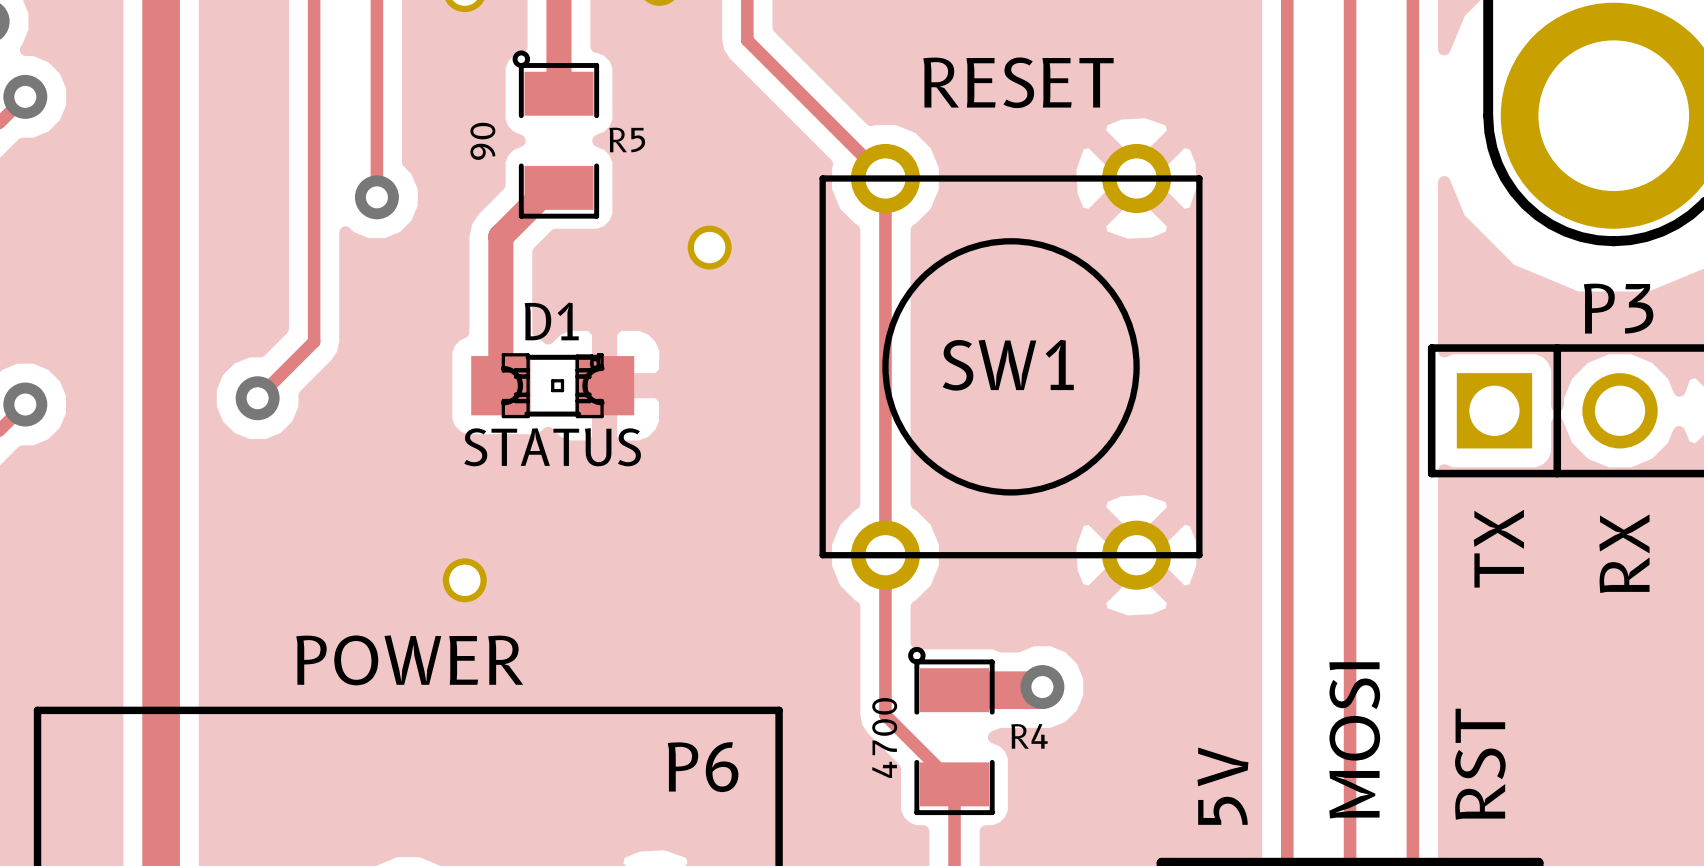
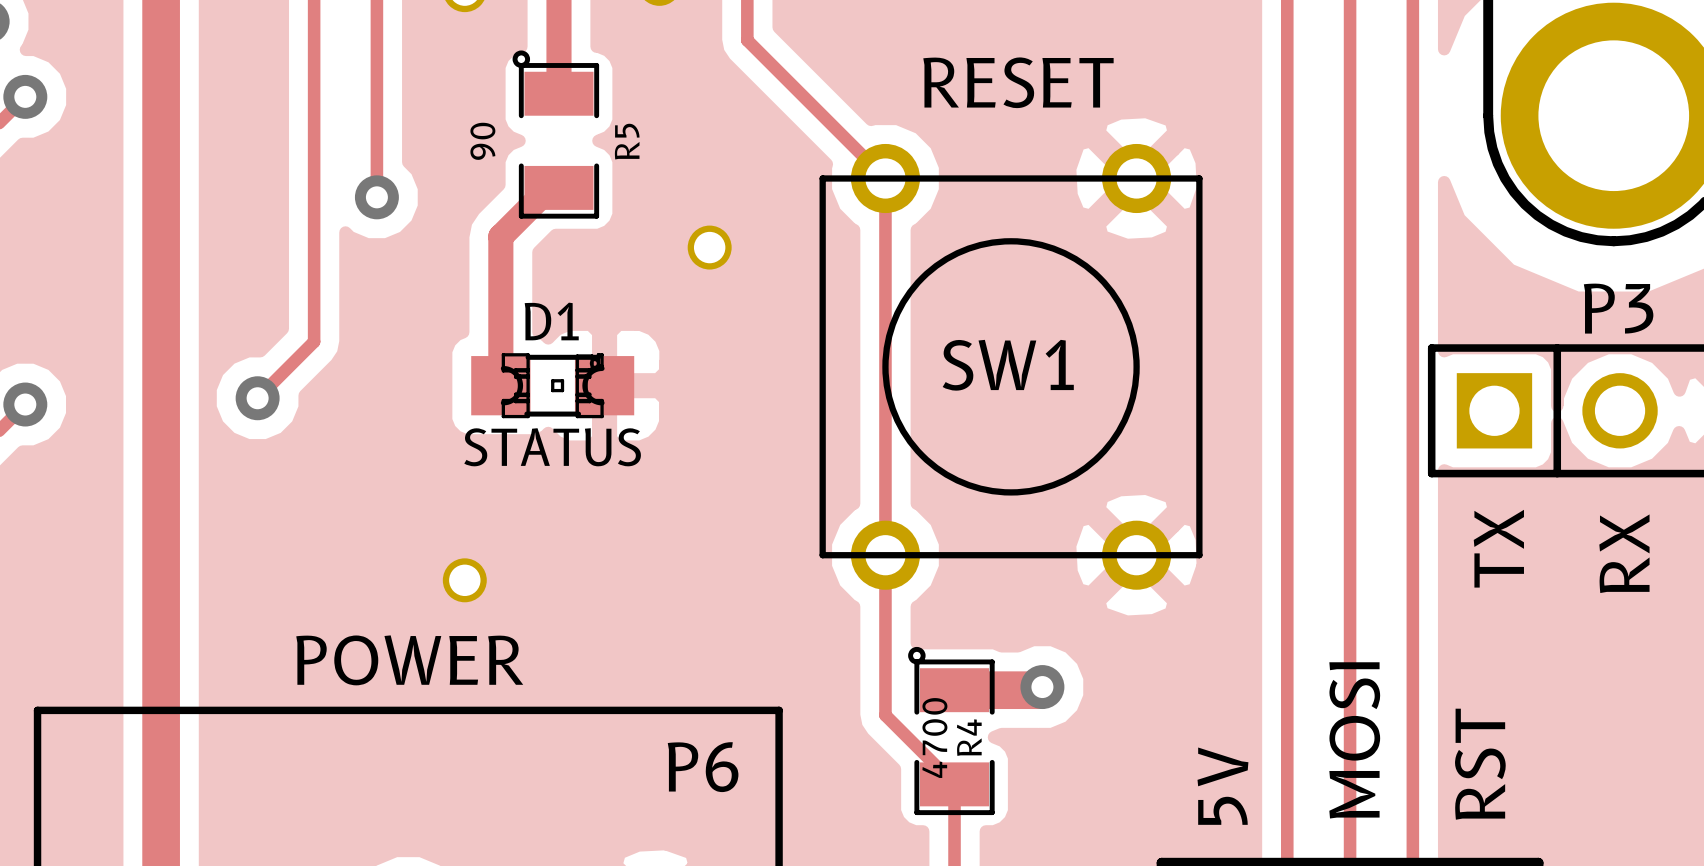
R5 name rotation: 0° (627, 139) -> 90° counterclockwise (627, 141)
R4 name rotation: 0° (1029, 736) -> 90° counterclockwise (969, 737)
R4 value position: 4700 (884, 738) -> 4700 (934, 738)

